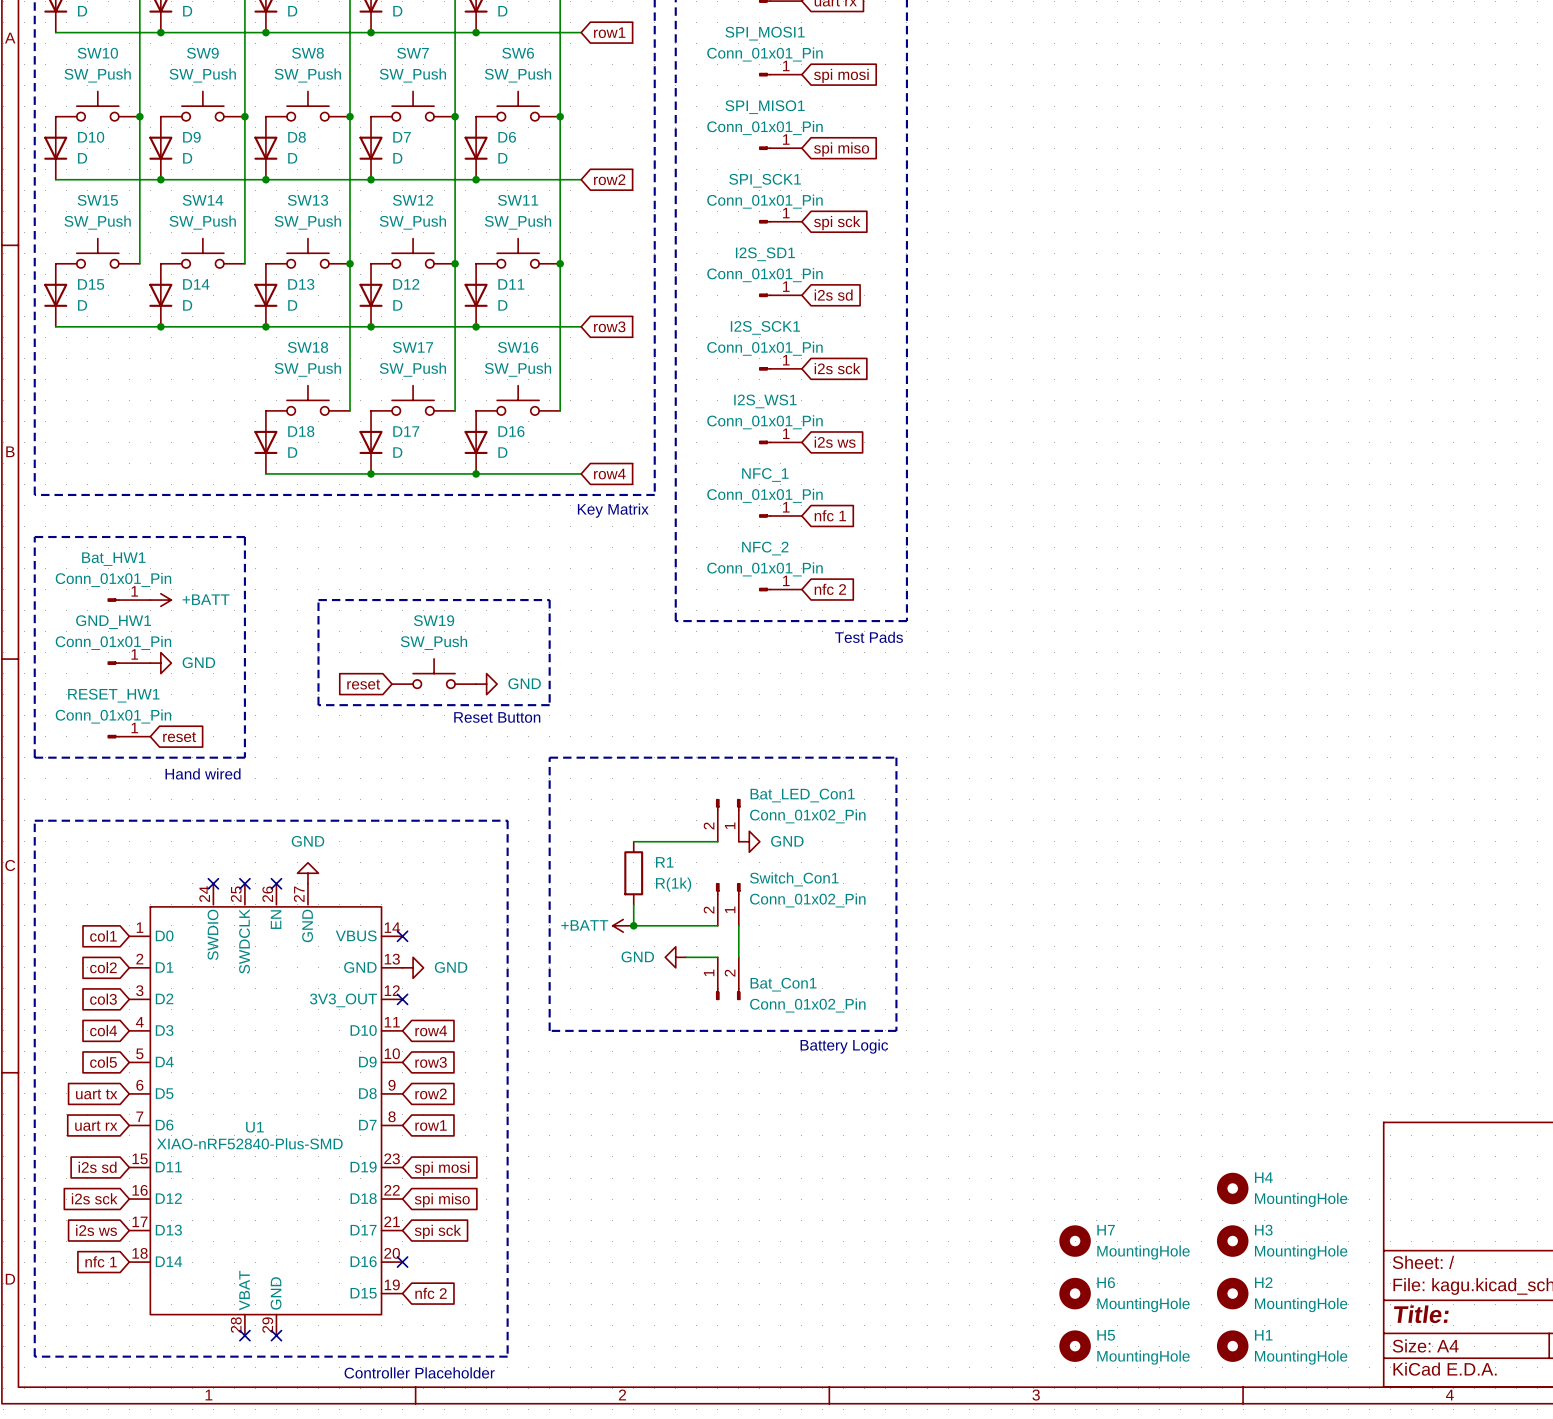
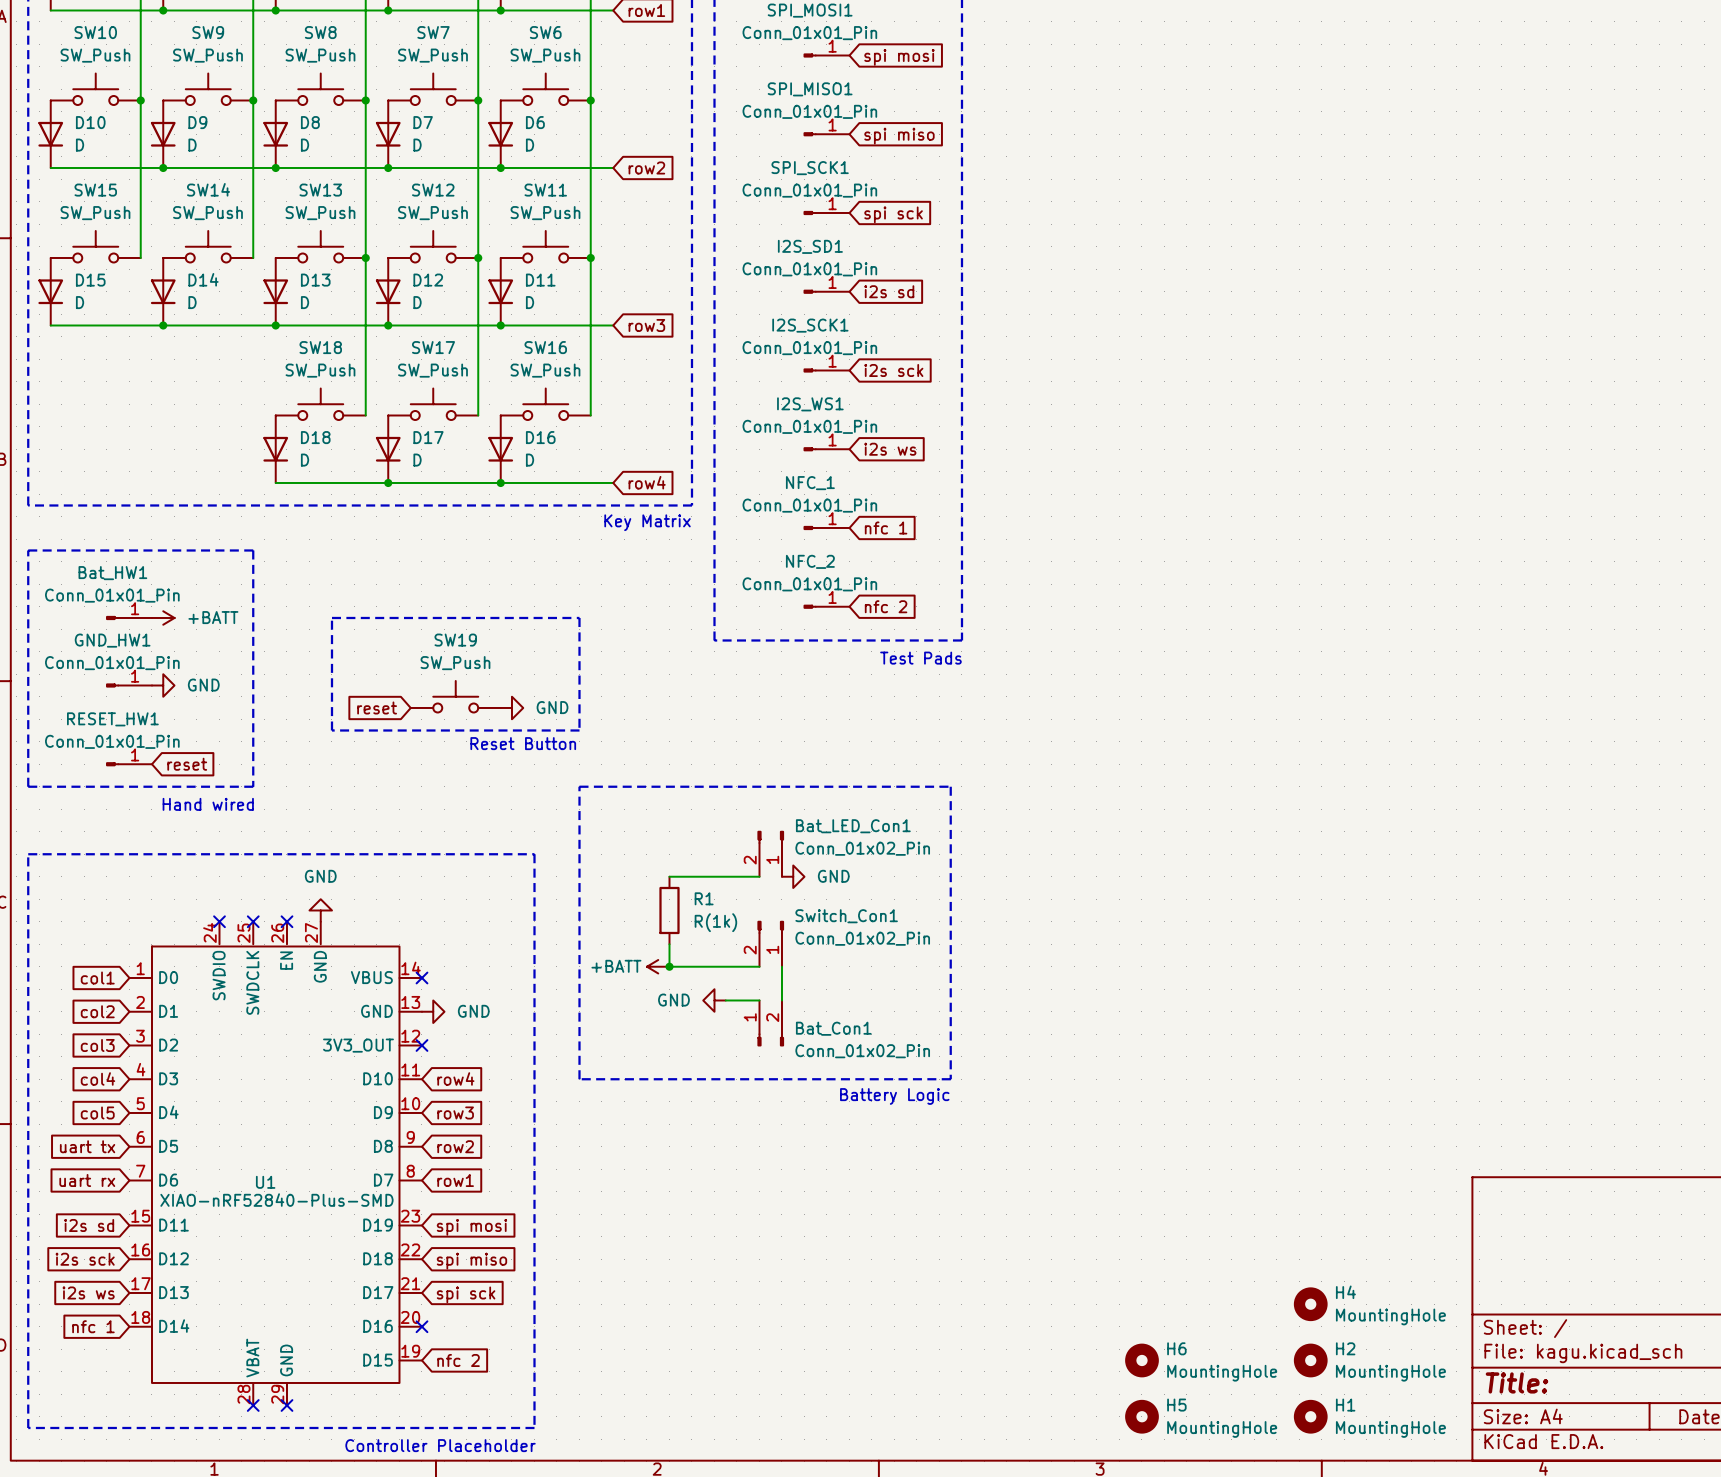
H4: MountingHole (1232, 1188) -> none
H3 name: H3 (1263, 1230) -> H4 (1345, 1292)
H7: MountingHole (1075, 1241) -> none

